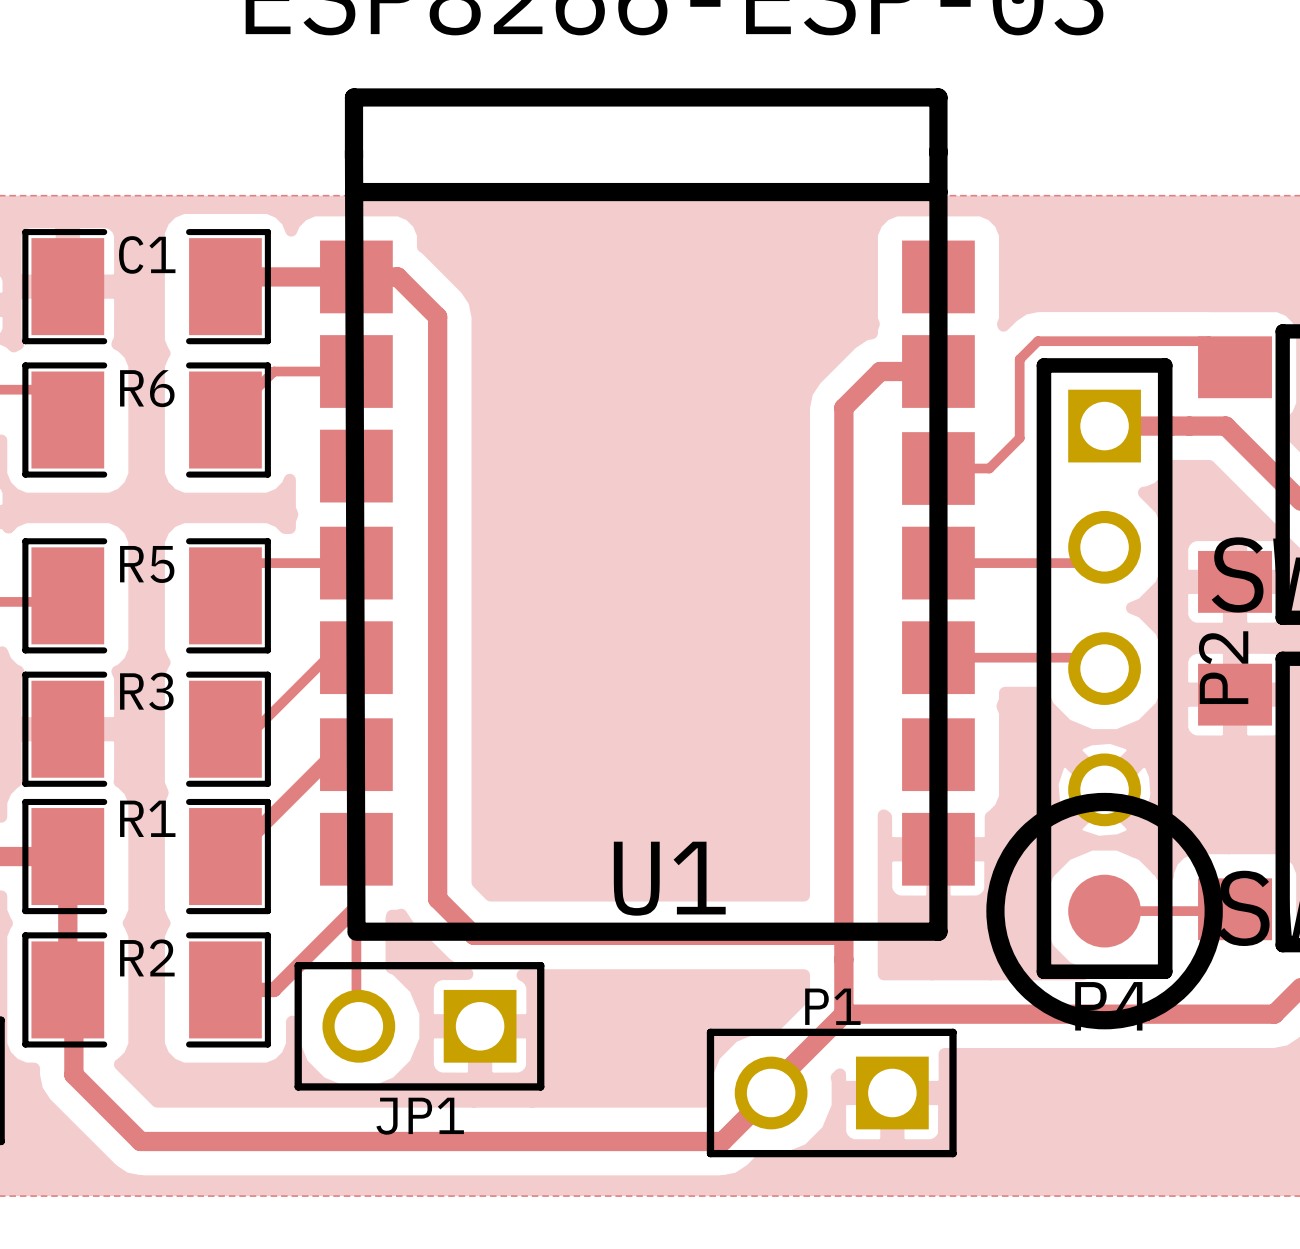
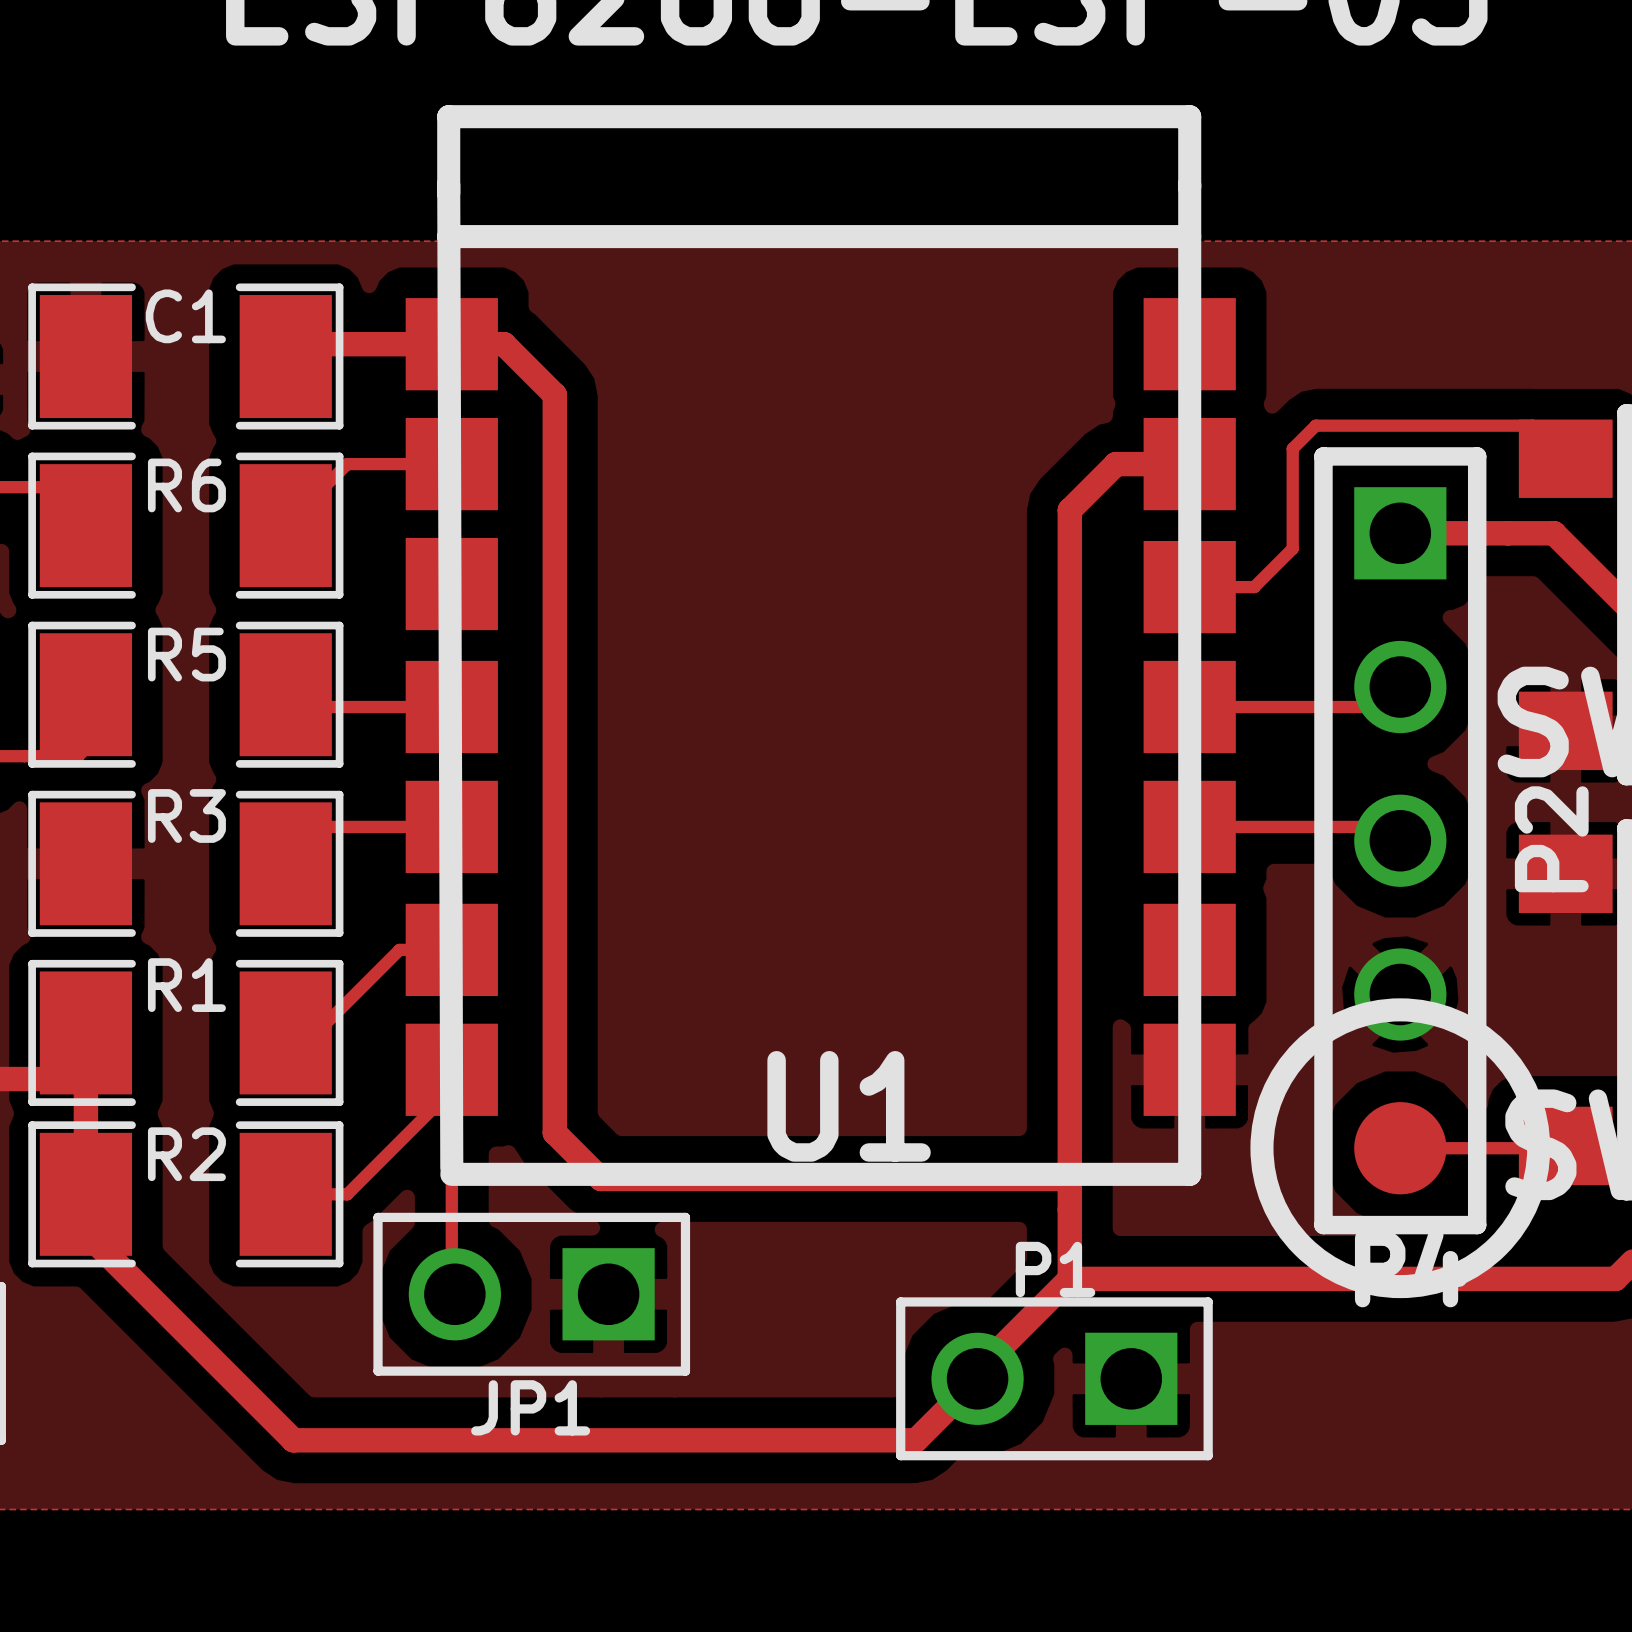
R5 position: (146, 595) -> (185, 694)
top track: (327, 657) (255, 729) (225, 729) -> (414, 826) (322, 826) (285, 863)
R3 position: (146, 729) -> (185, 863)
top track: (333, 754) (231, 856) (225, 856) -> (422, 949) (399, 949) (316, 1032) (285, 1032)
top track: (356, 849) (356, 907) (273, 989) (225, 989) -> none
R1 position: (146, 856) -> (185, 1032)
top track: none -> (451, 1089) (347, 1194) (285, 1194)
top track: (67, 977) (67, 989) (73, 995) (73, 1074) (140, 1141) (231, 1141) -> (85, 1232) (293, 1440)
R2 position: (146, 989) -> (185, 1194)

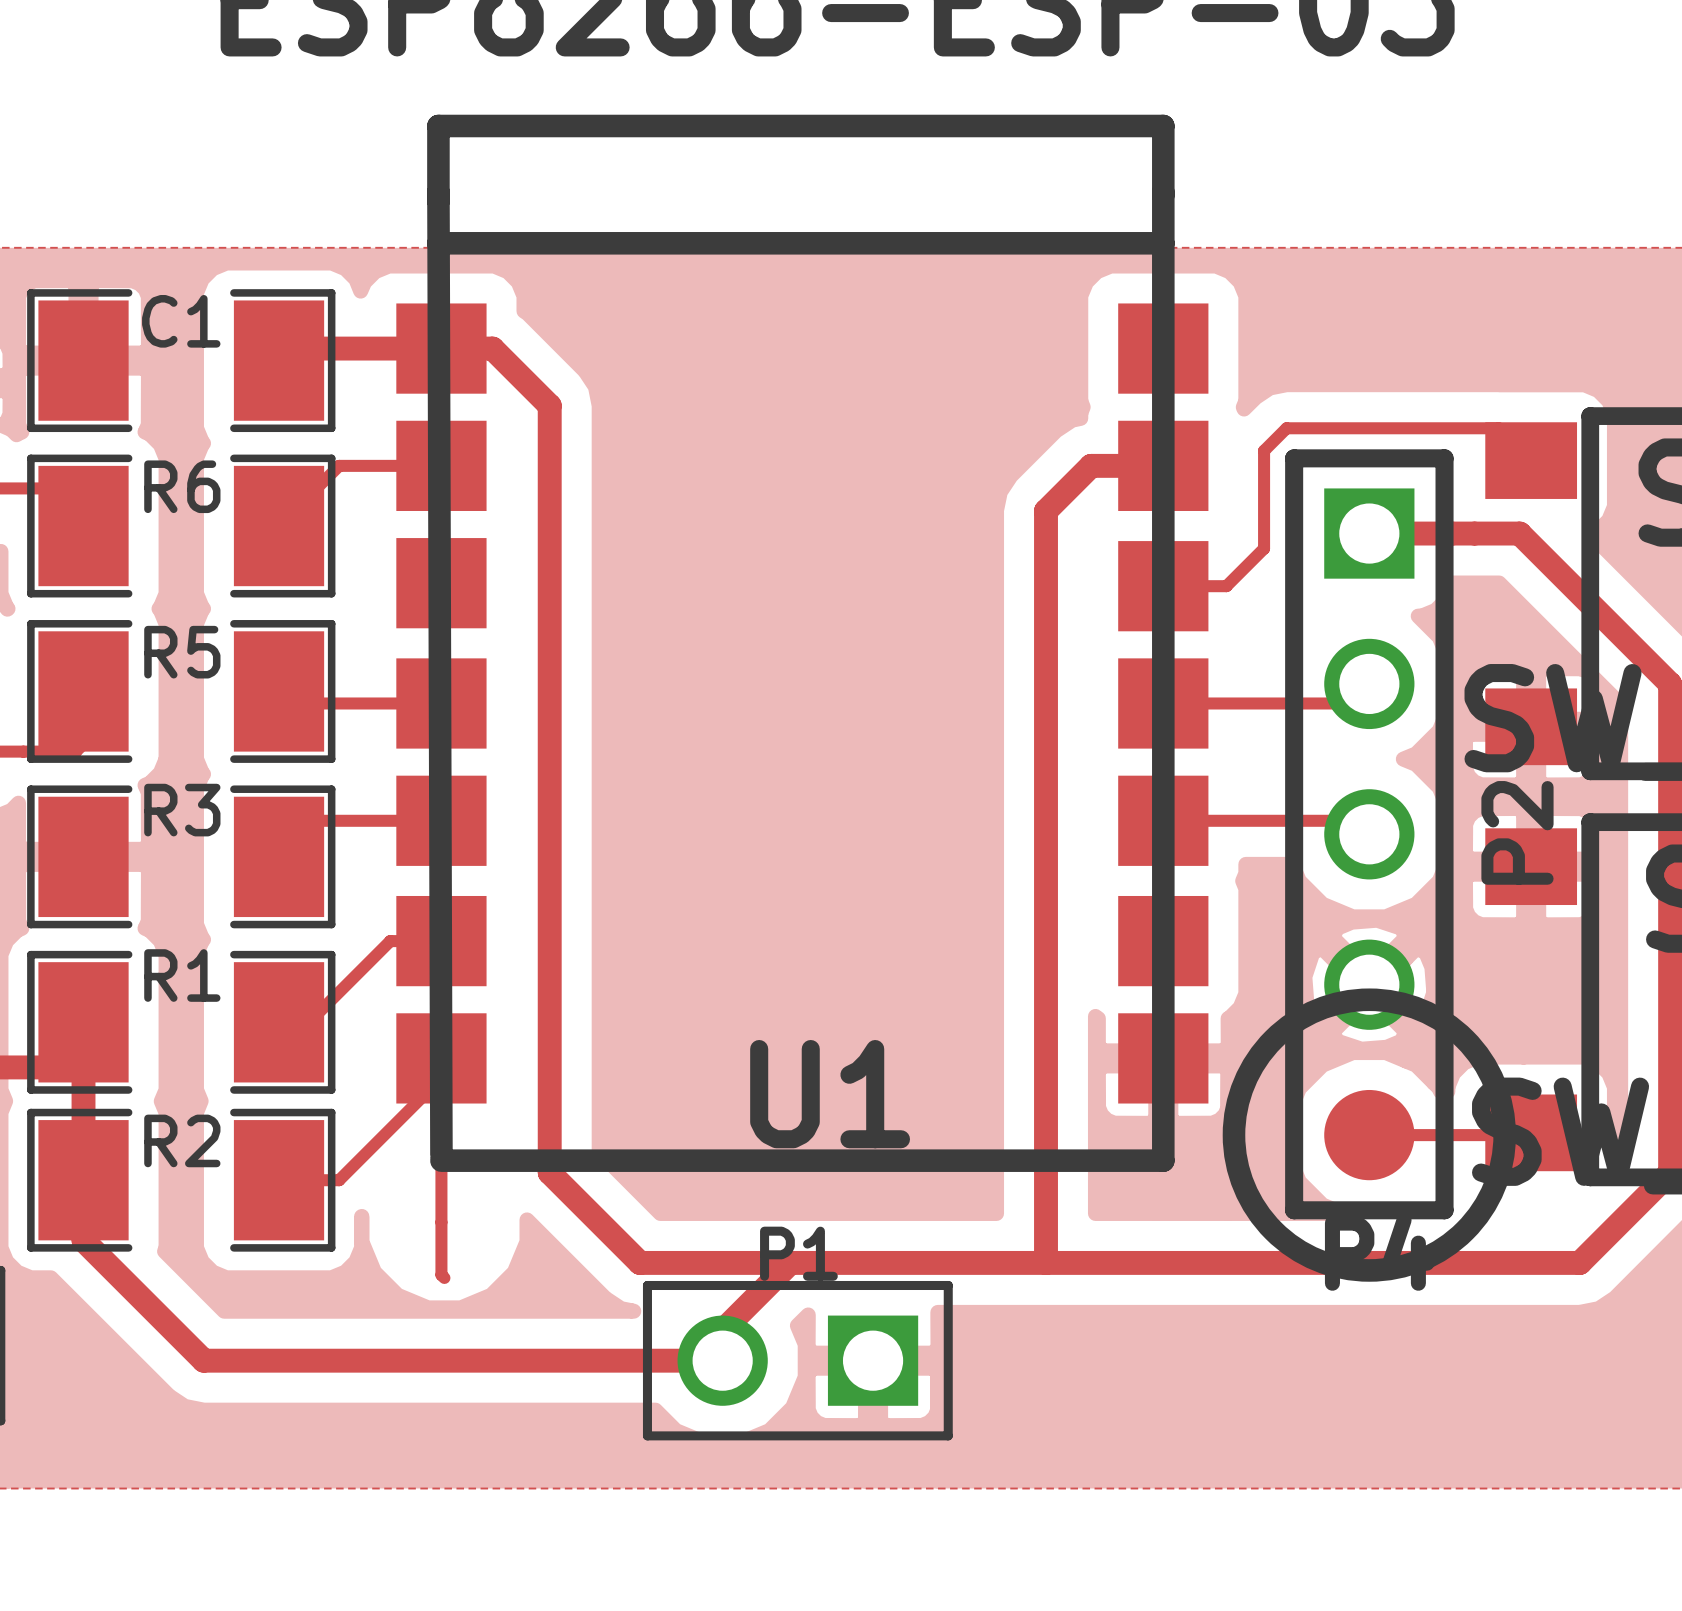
top track: (554, 394) (554, 1132) (600, 1178) (1069, 1178) -> (542, 398) (549, 405) (549, 1172) (639, 1262) (1046, 1262)
top track: (85, 1232) (293, 1440) (916, 1440) (977, 1378) (977, 1371) (1069, 1278) -> (83, 1217) (83, 1240) (203, 1360) (722, 1360) (722, 1330) (790, 1262)
JP1: (531, 1294) -> none
P1 position: (1054, 1378) -> (797, 1360)

